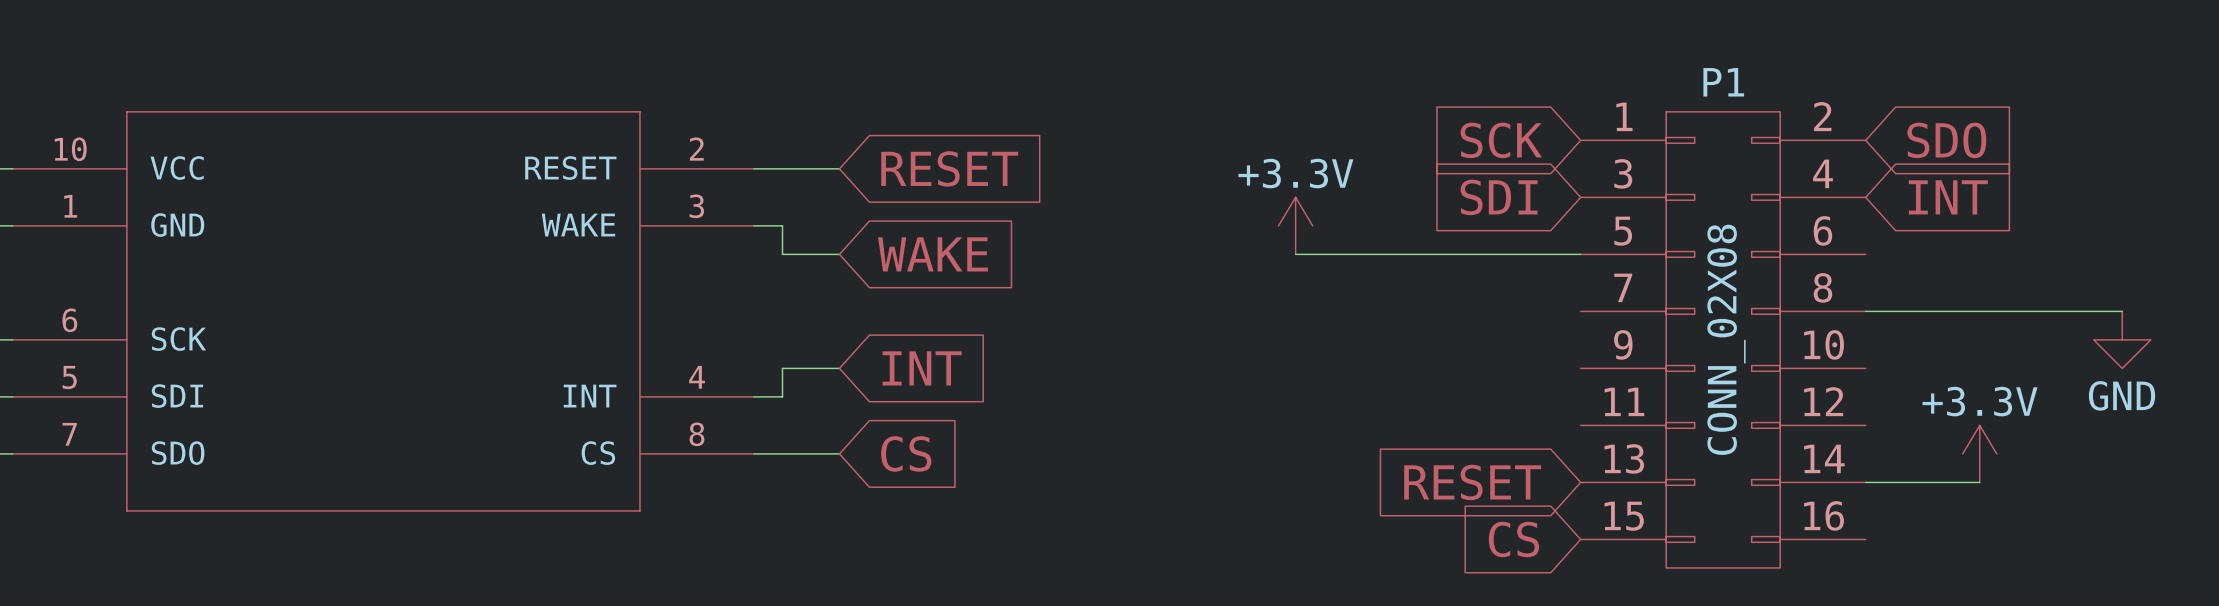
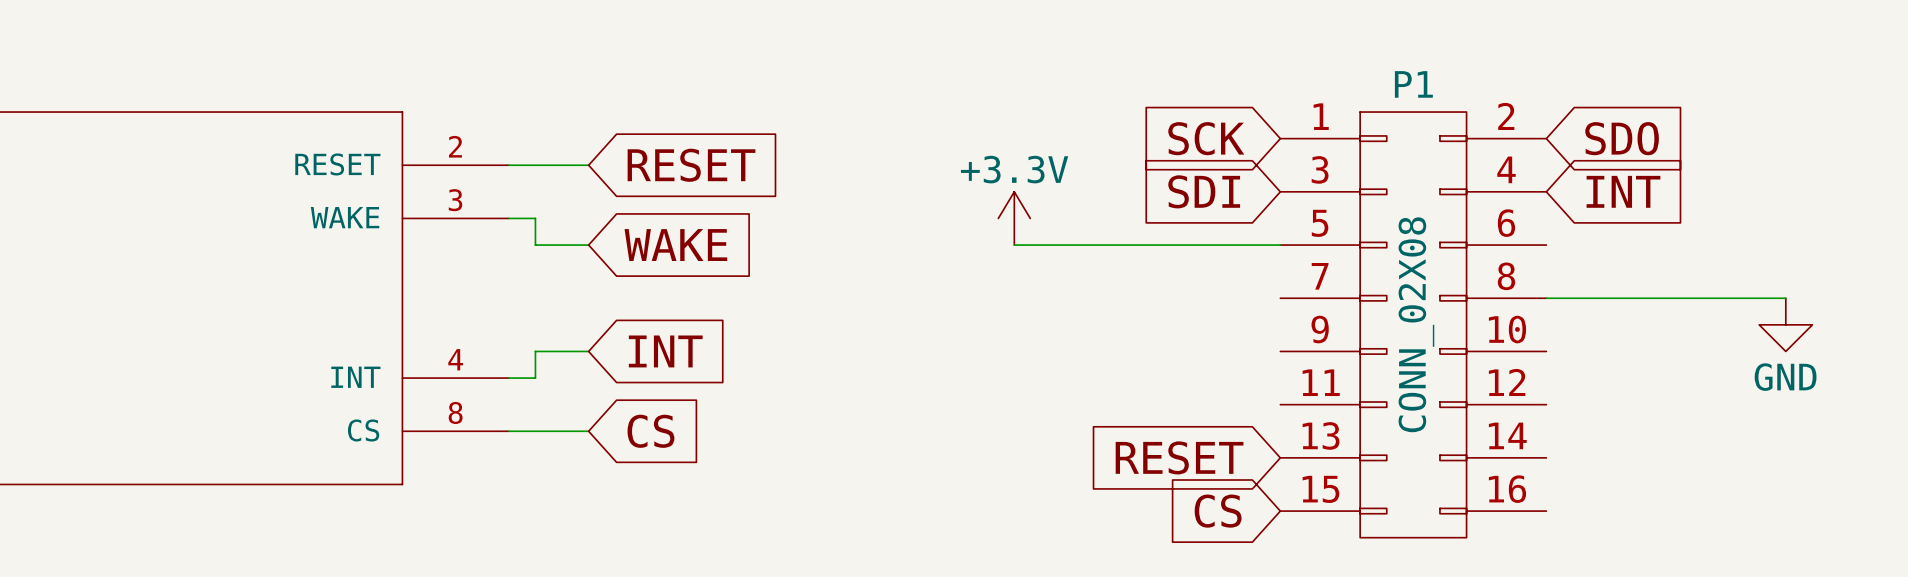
power symbol: +3.3V (1979, 453) -> none
wire: (1865, 482) (1979, 482) -> none

